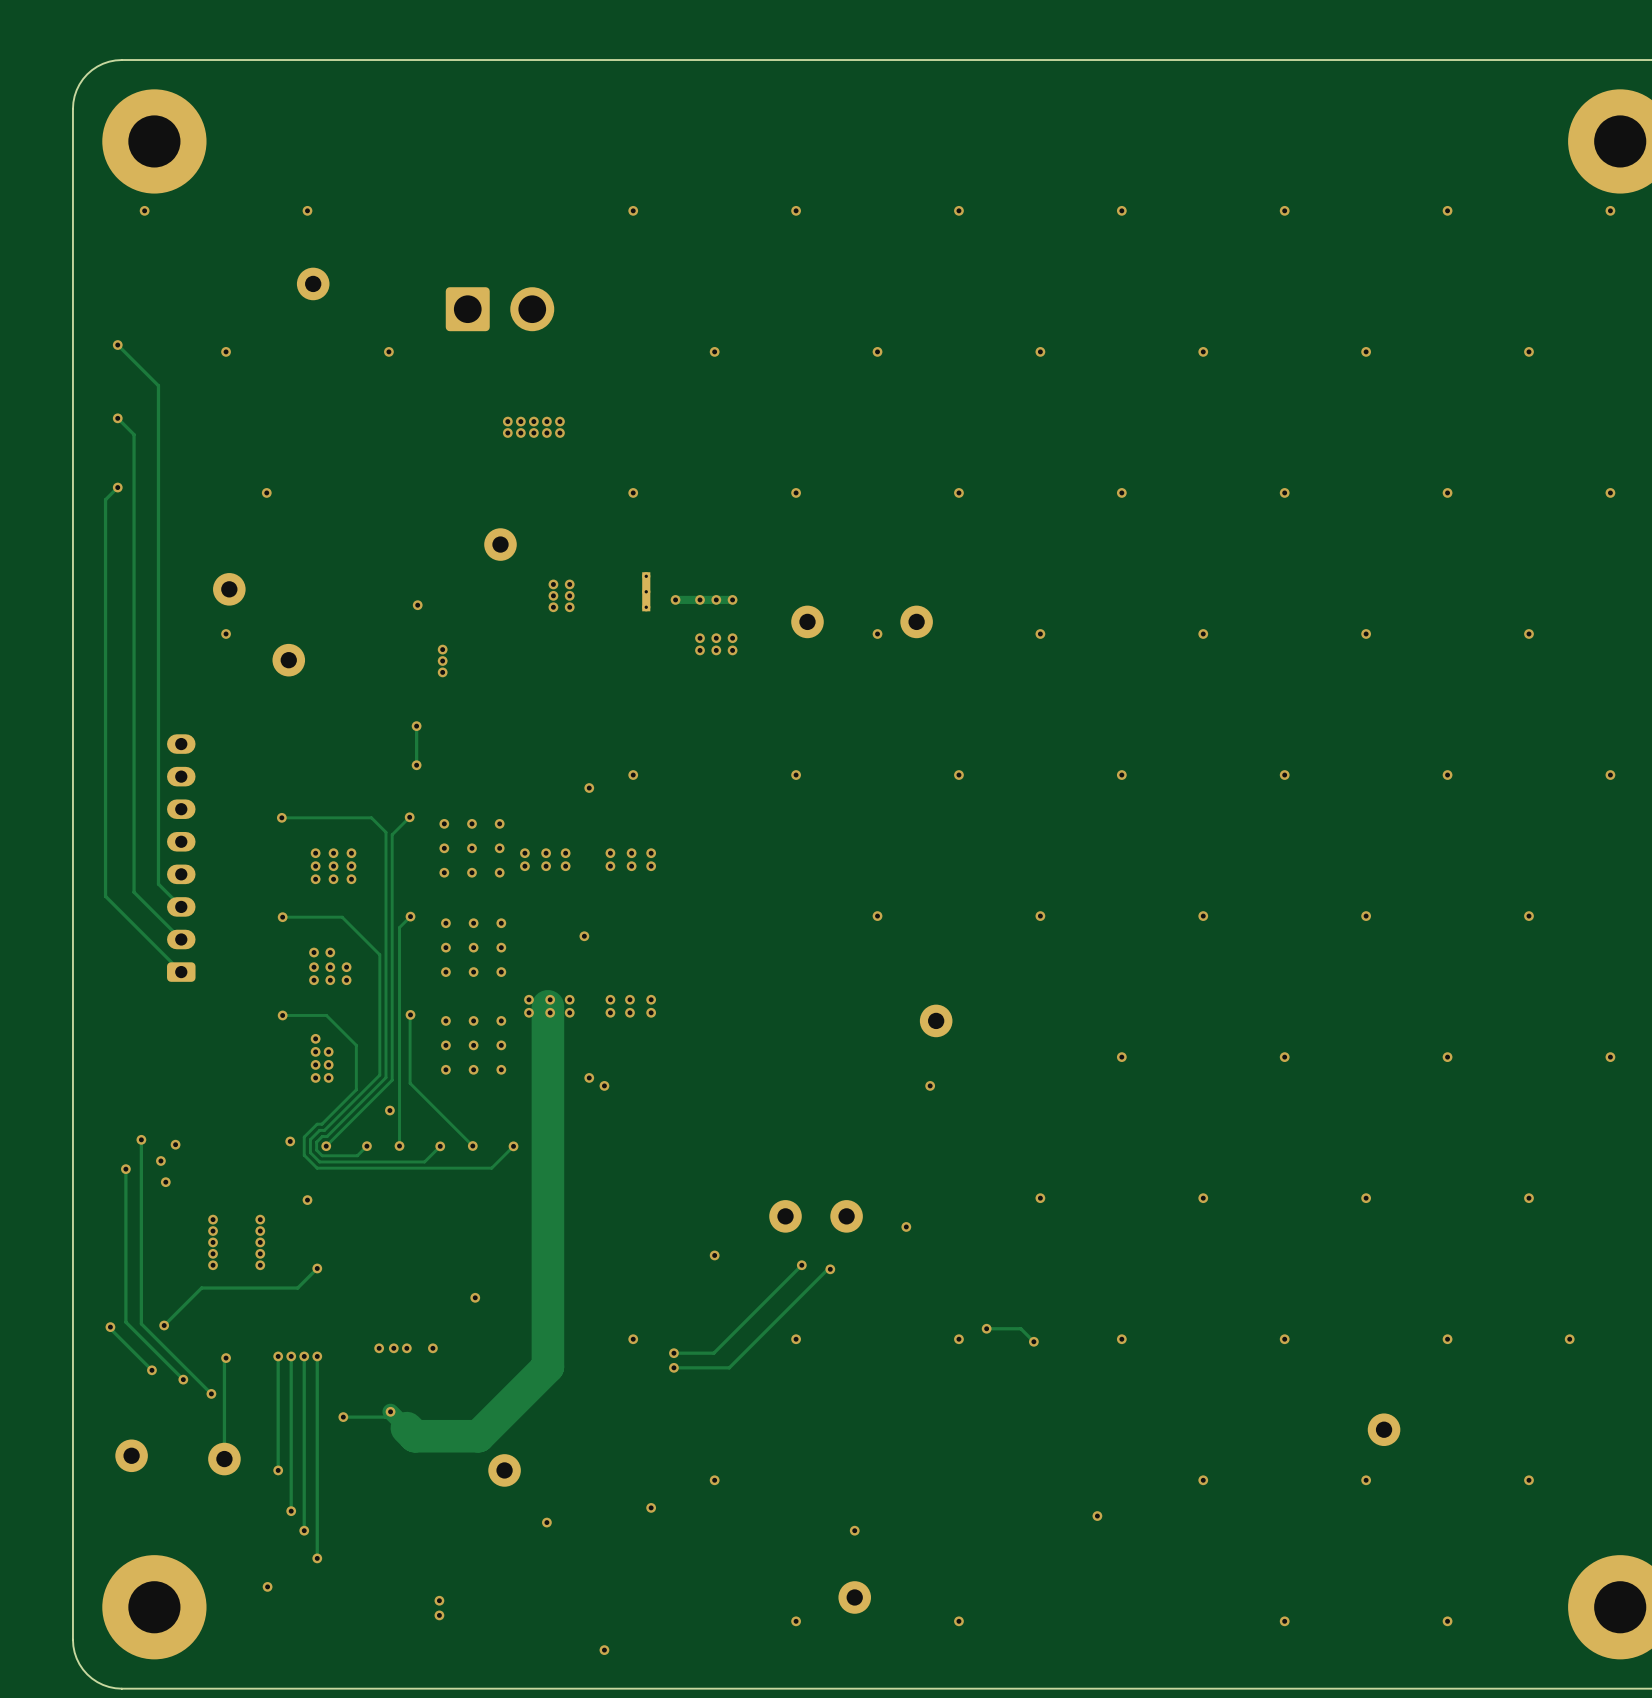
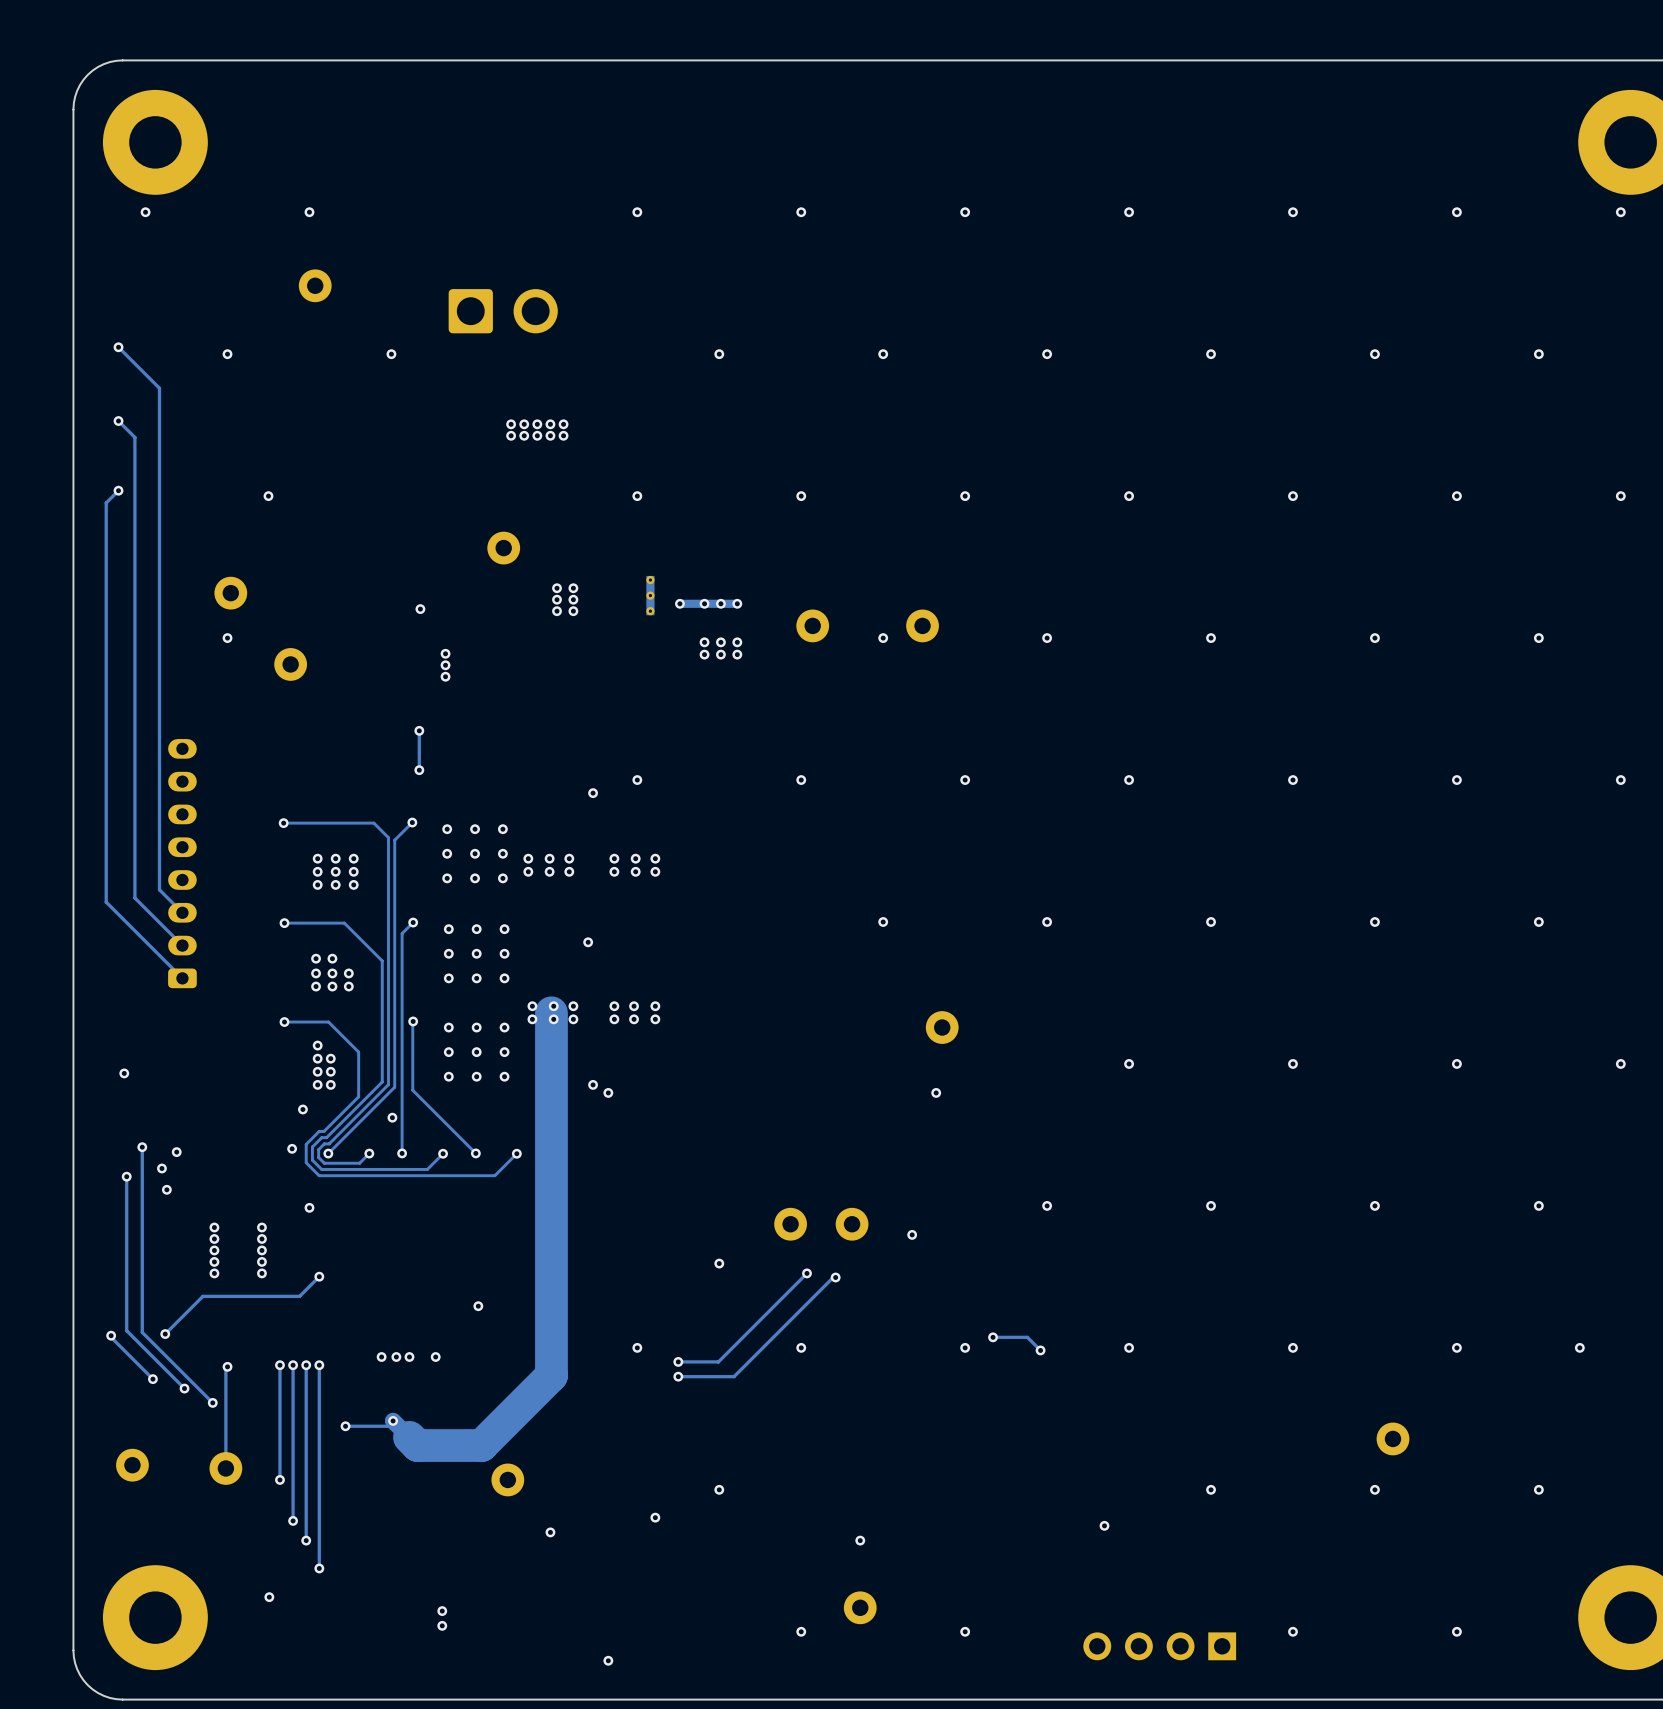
via: none -> (124, 1073)
via: none -> (302, 1109)
part: none -> (1159, 1646)

